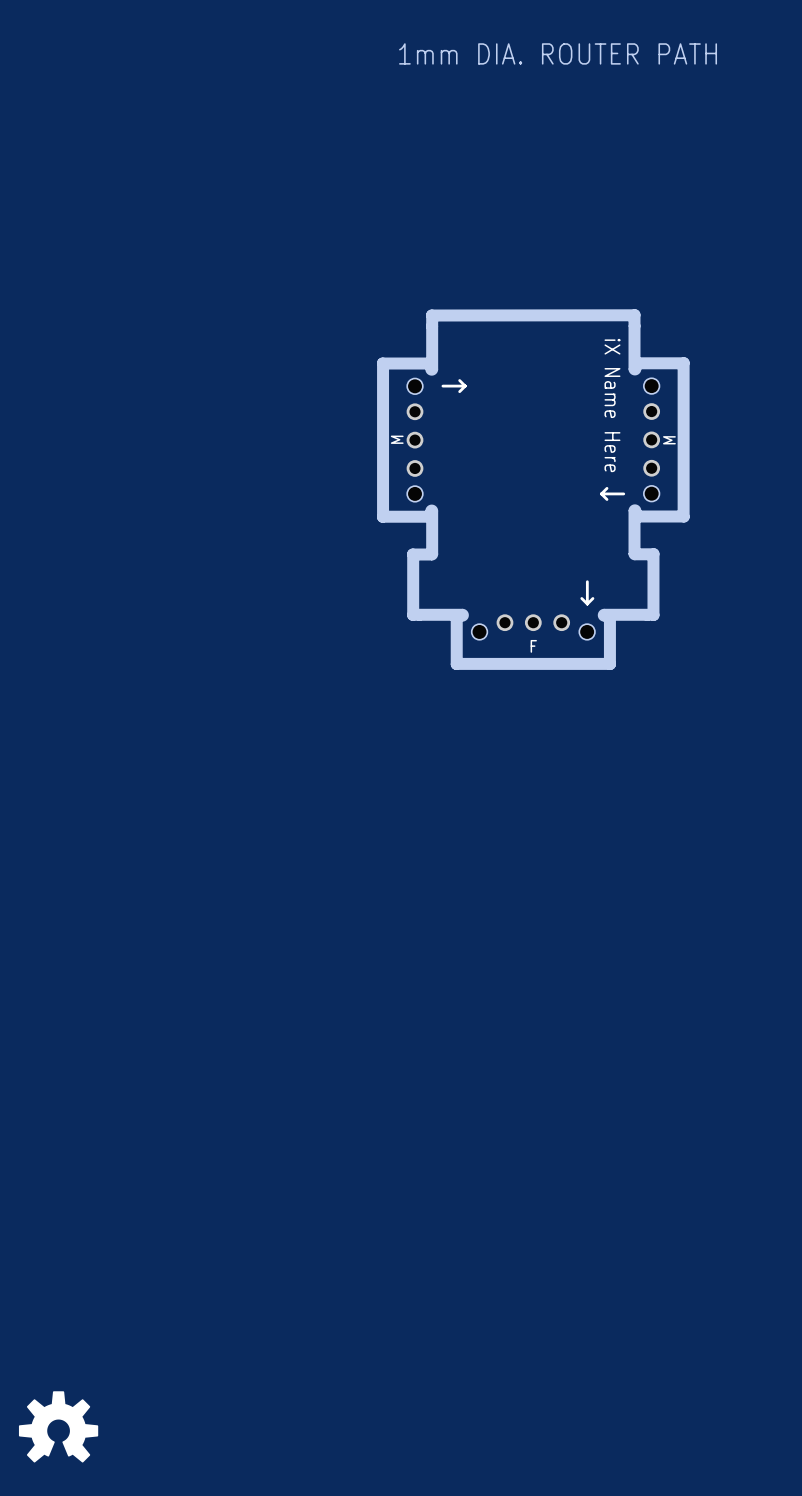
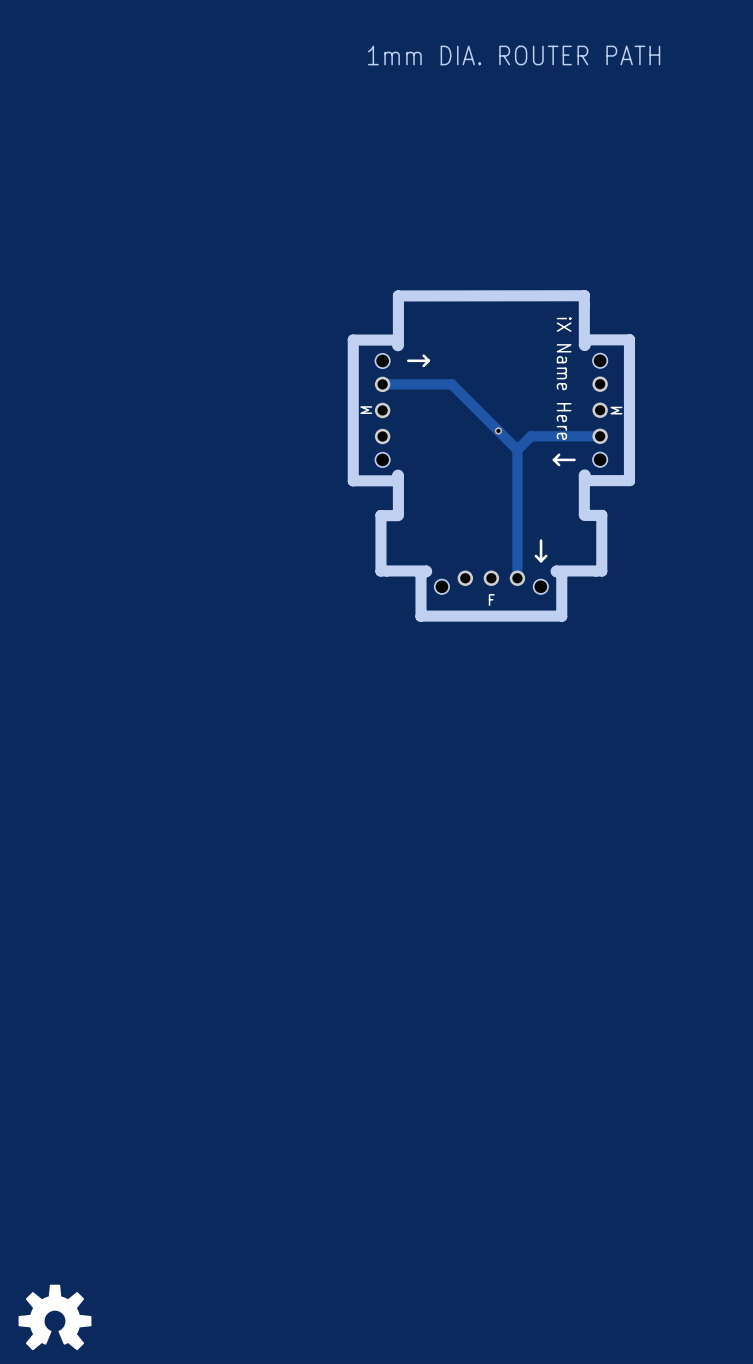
track: none -> (382, 384) (451, 384) (517, 449)
via: none -> (498, 430)
track: none -> (600, 436) (531, 436) (517, 449)
track: none -> (517, 449) (517, 578)

